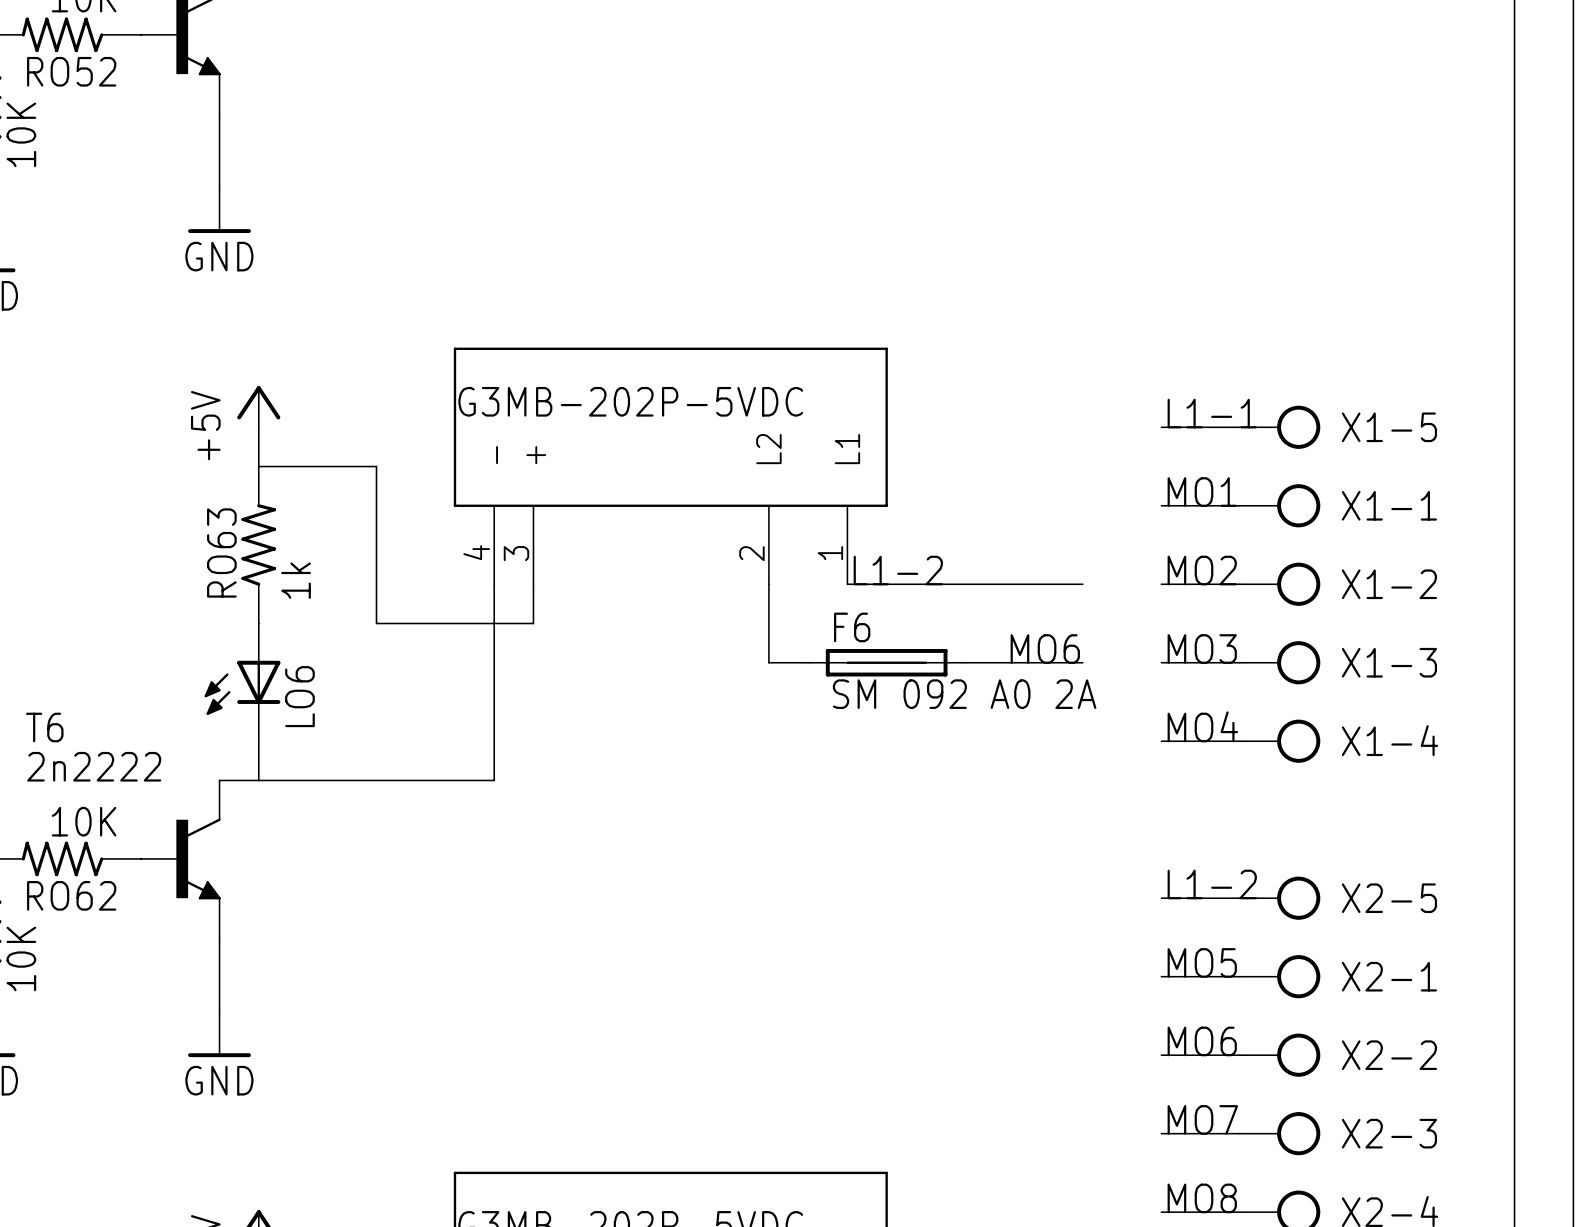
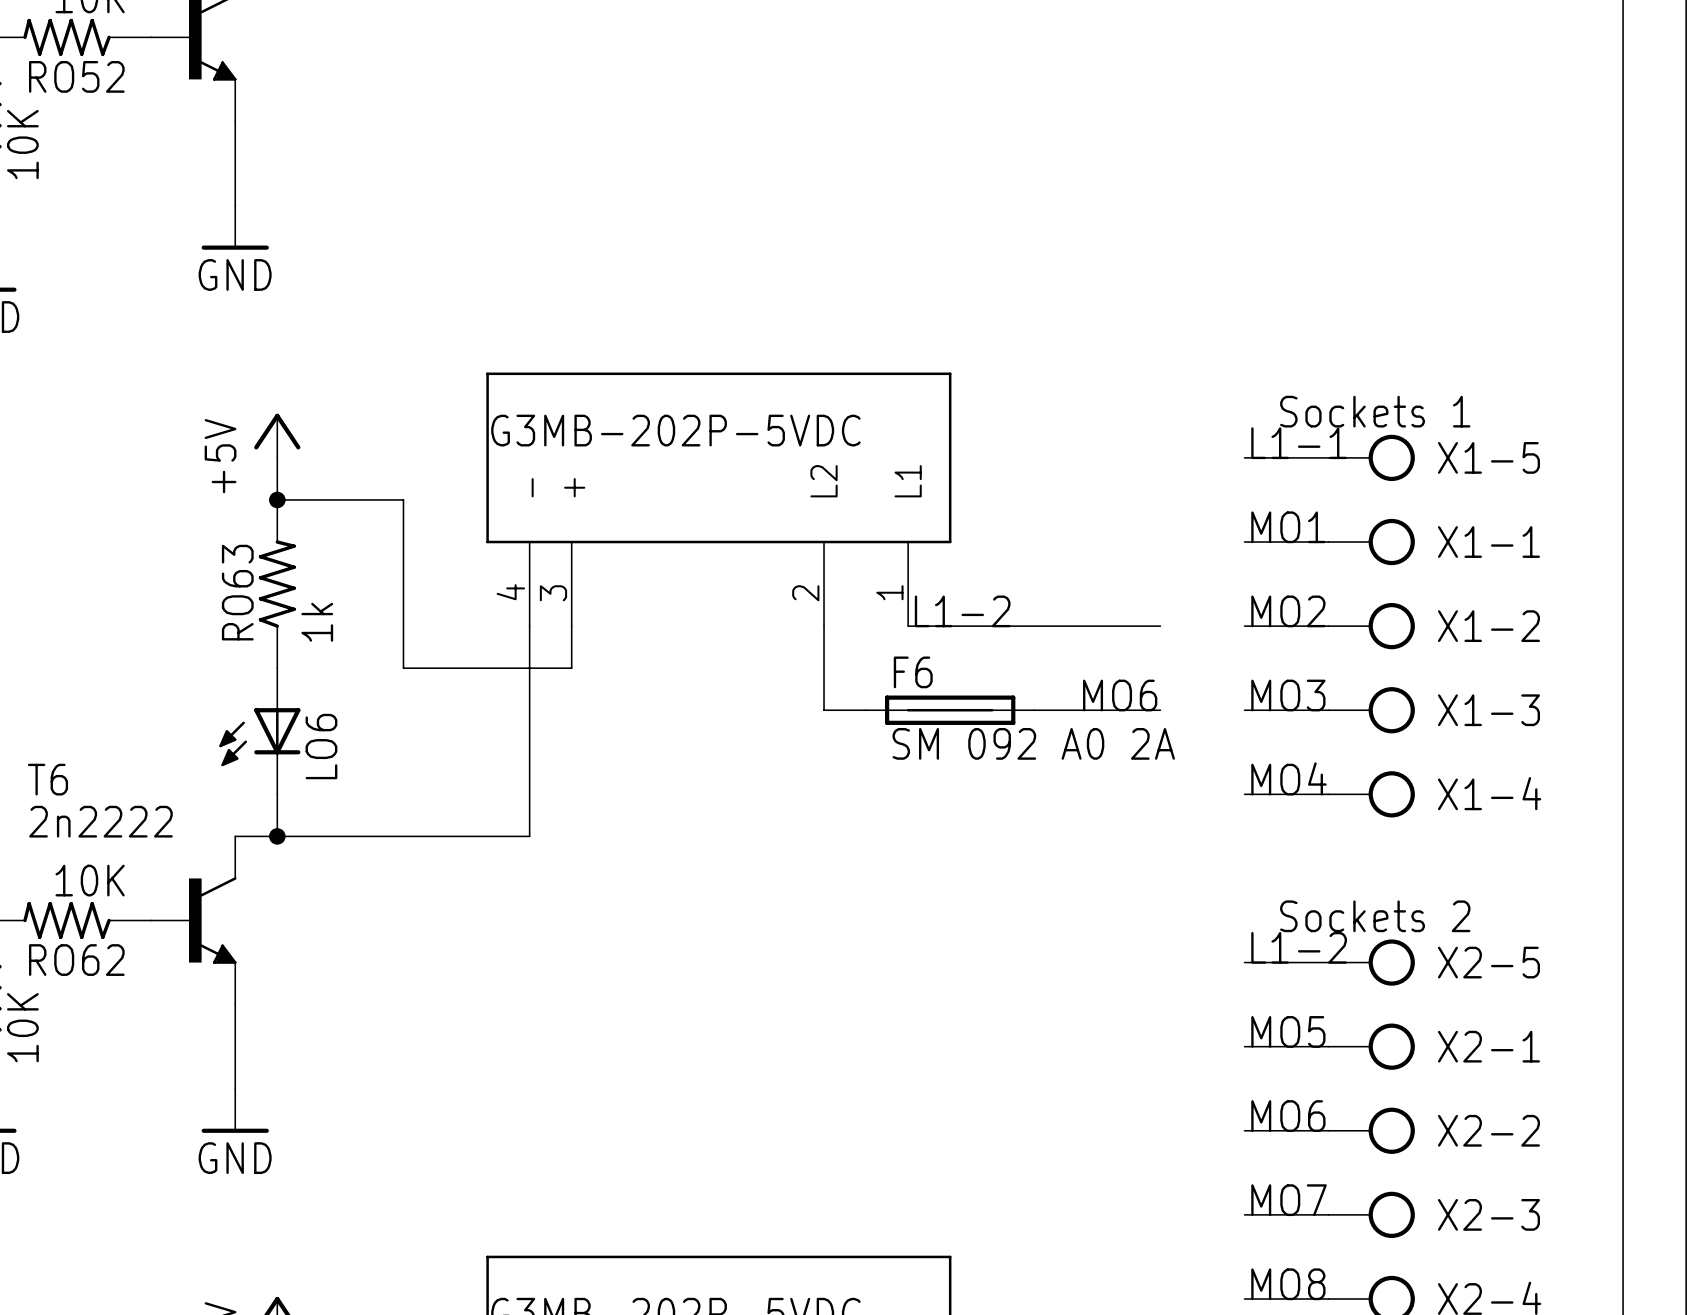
X1-5 value: none -> Sockets 1 (1375, 411)
junction: none -> (277, 499)
junction: none -> (277, 836)
X2-5 value: none -> Sockets 2 (1375, 916)

